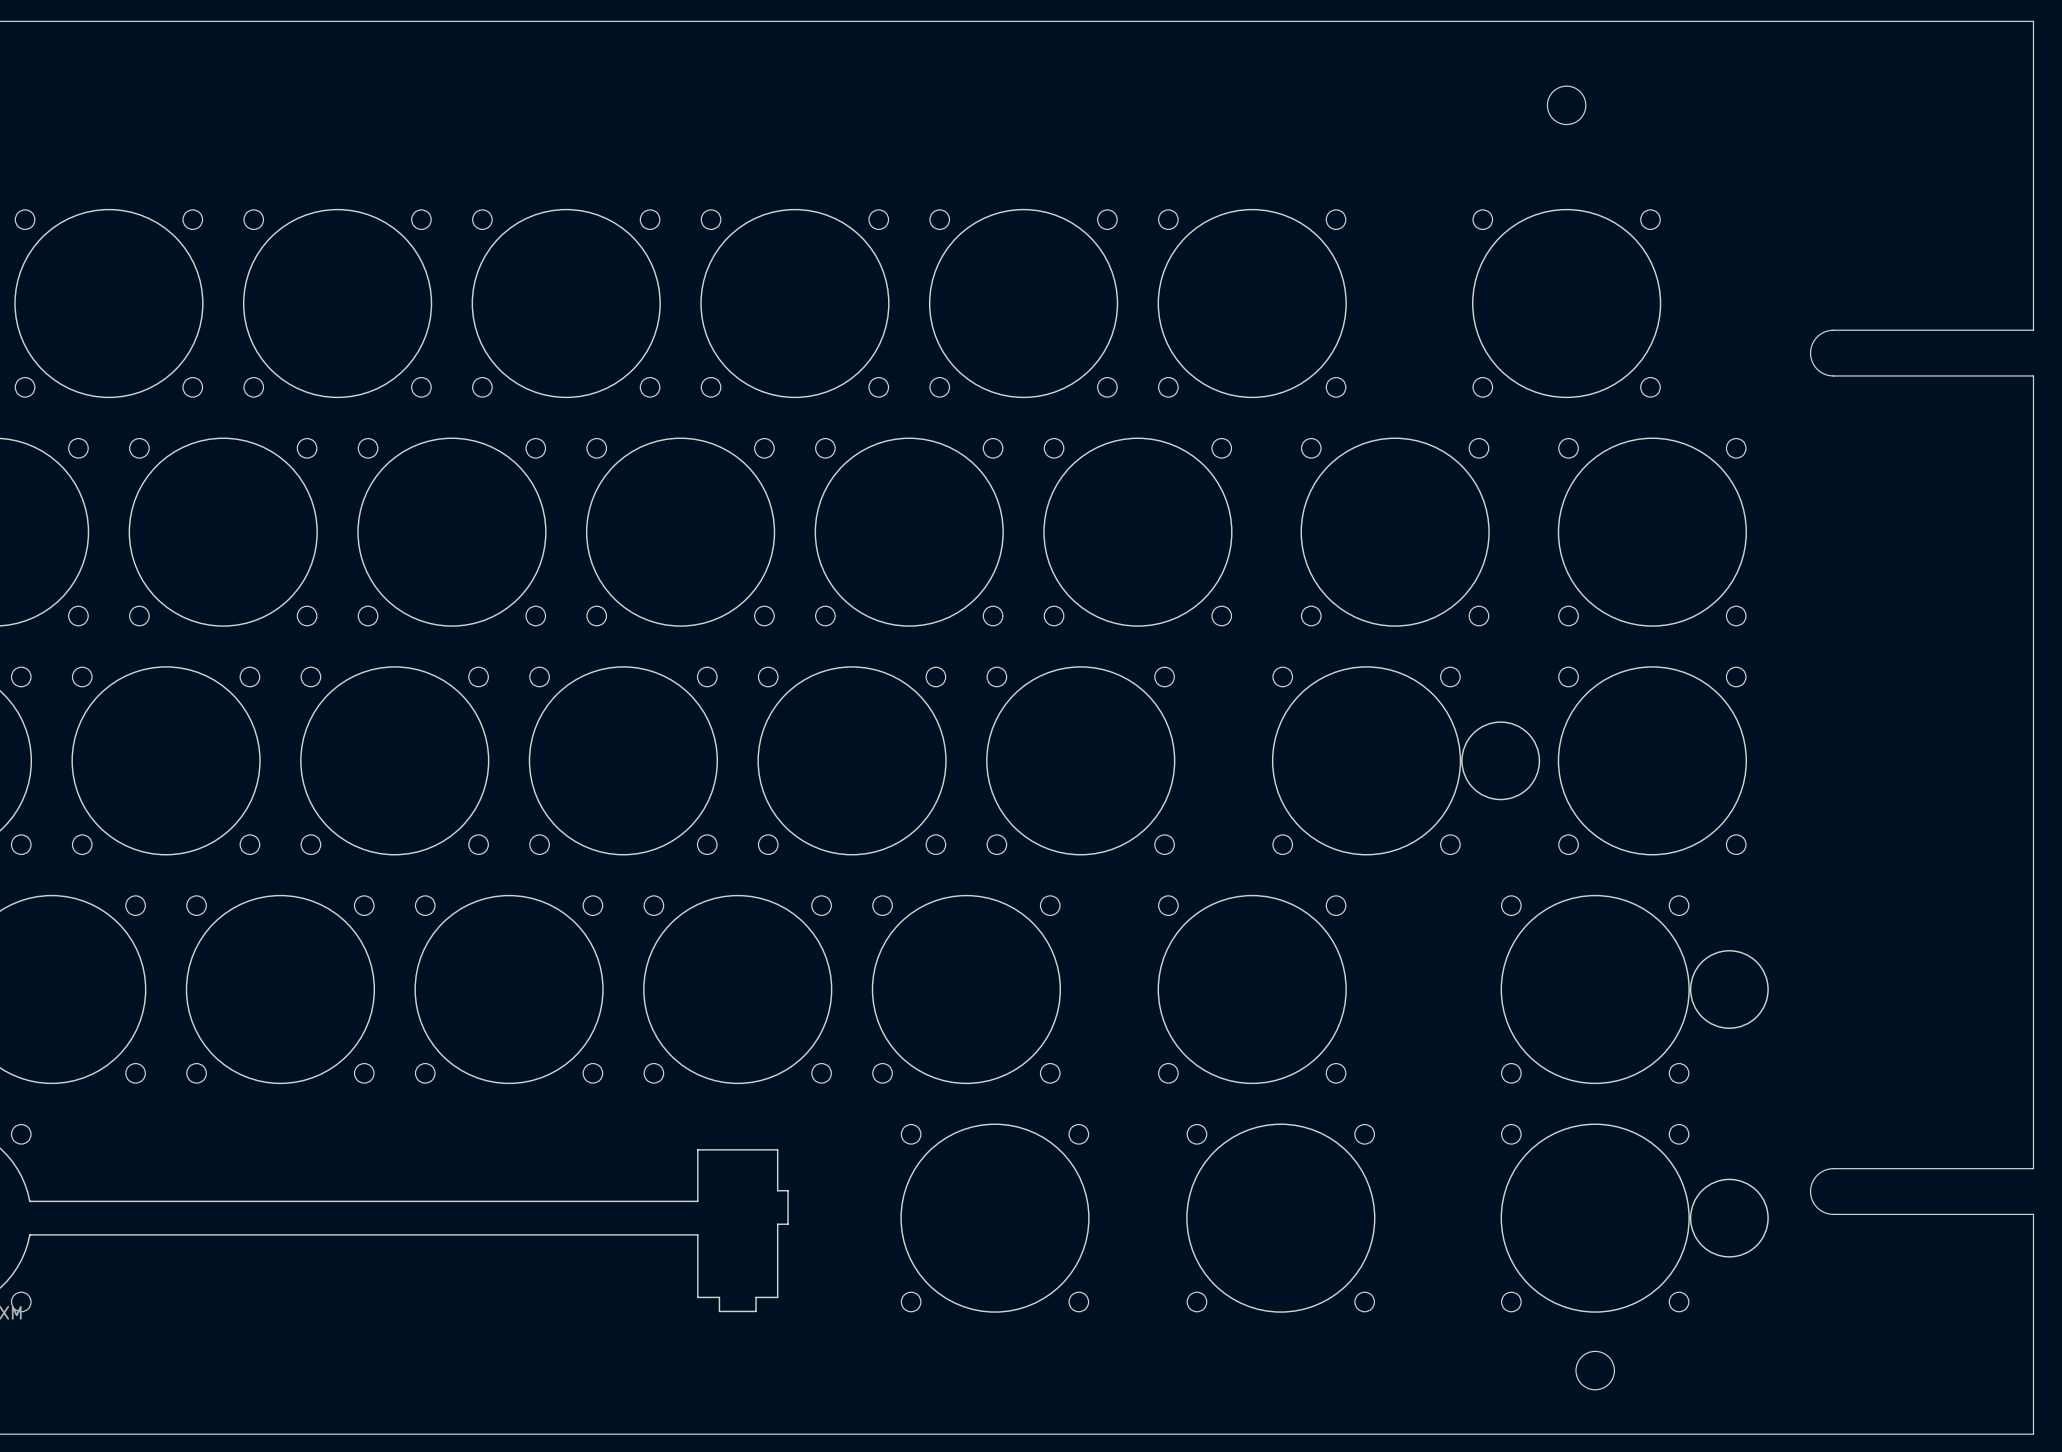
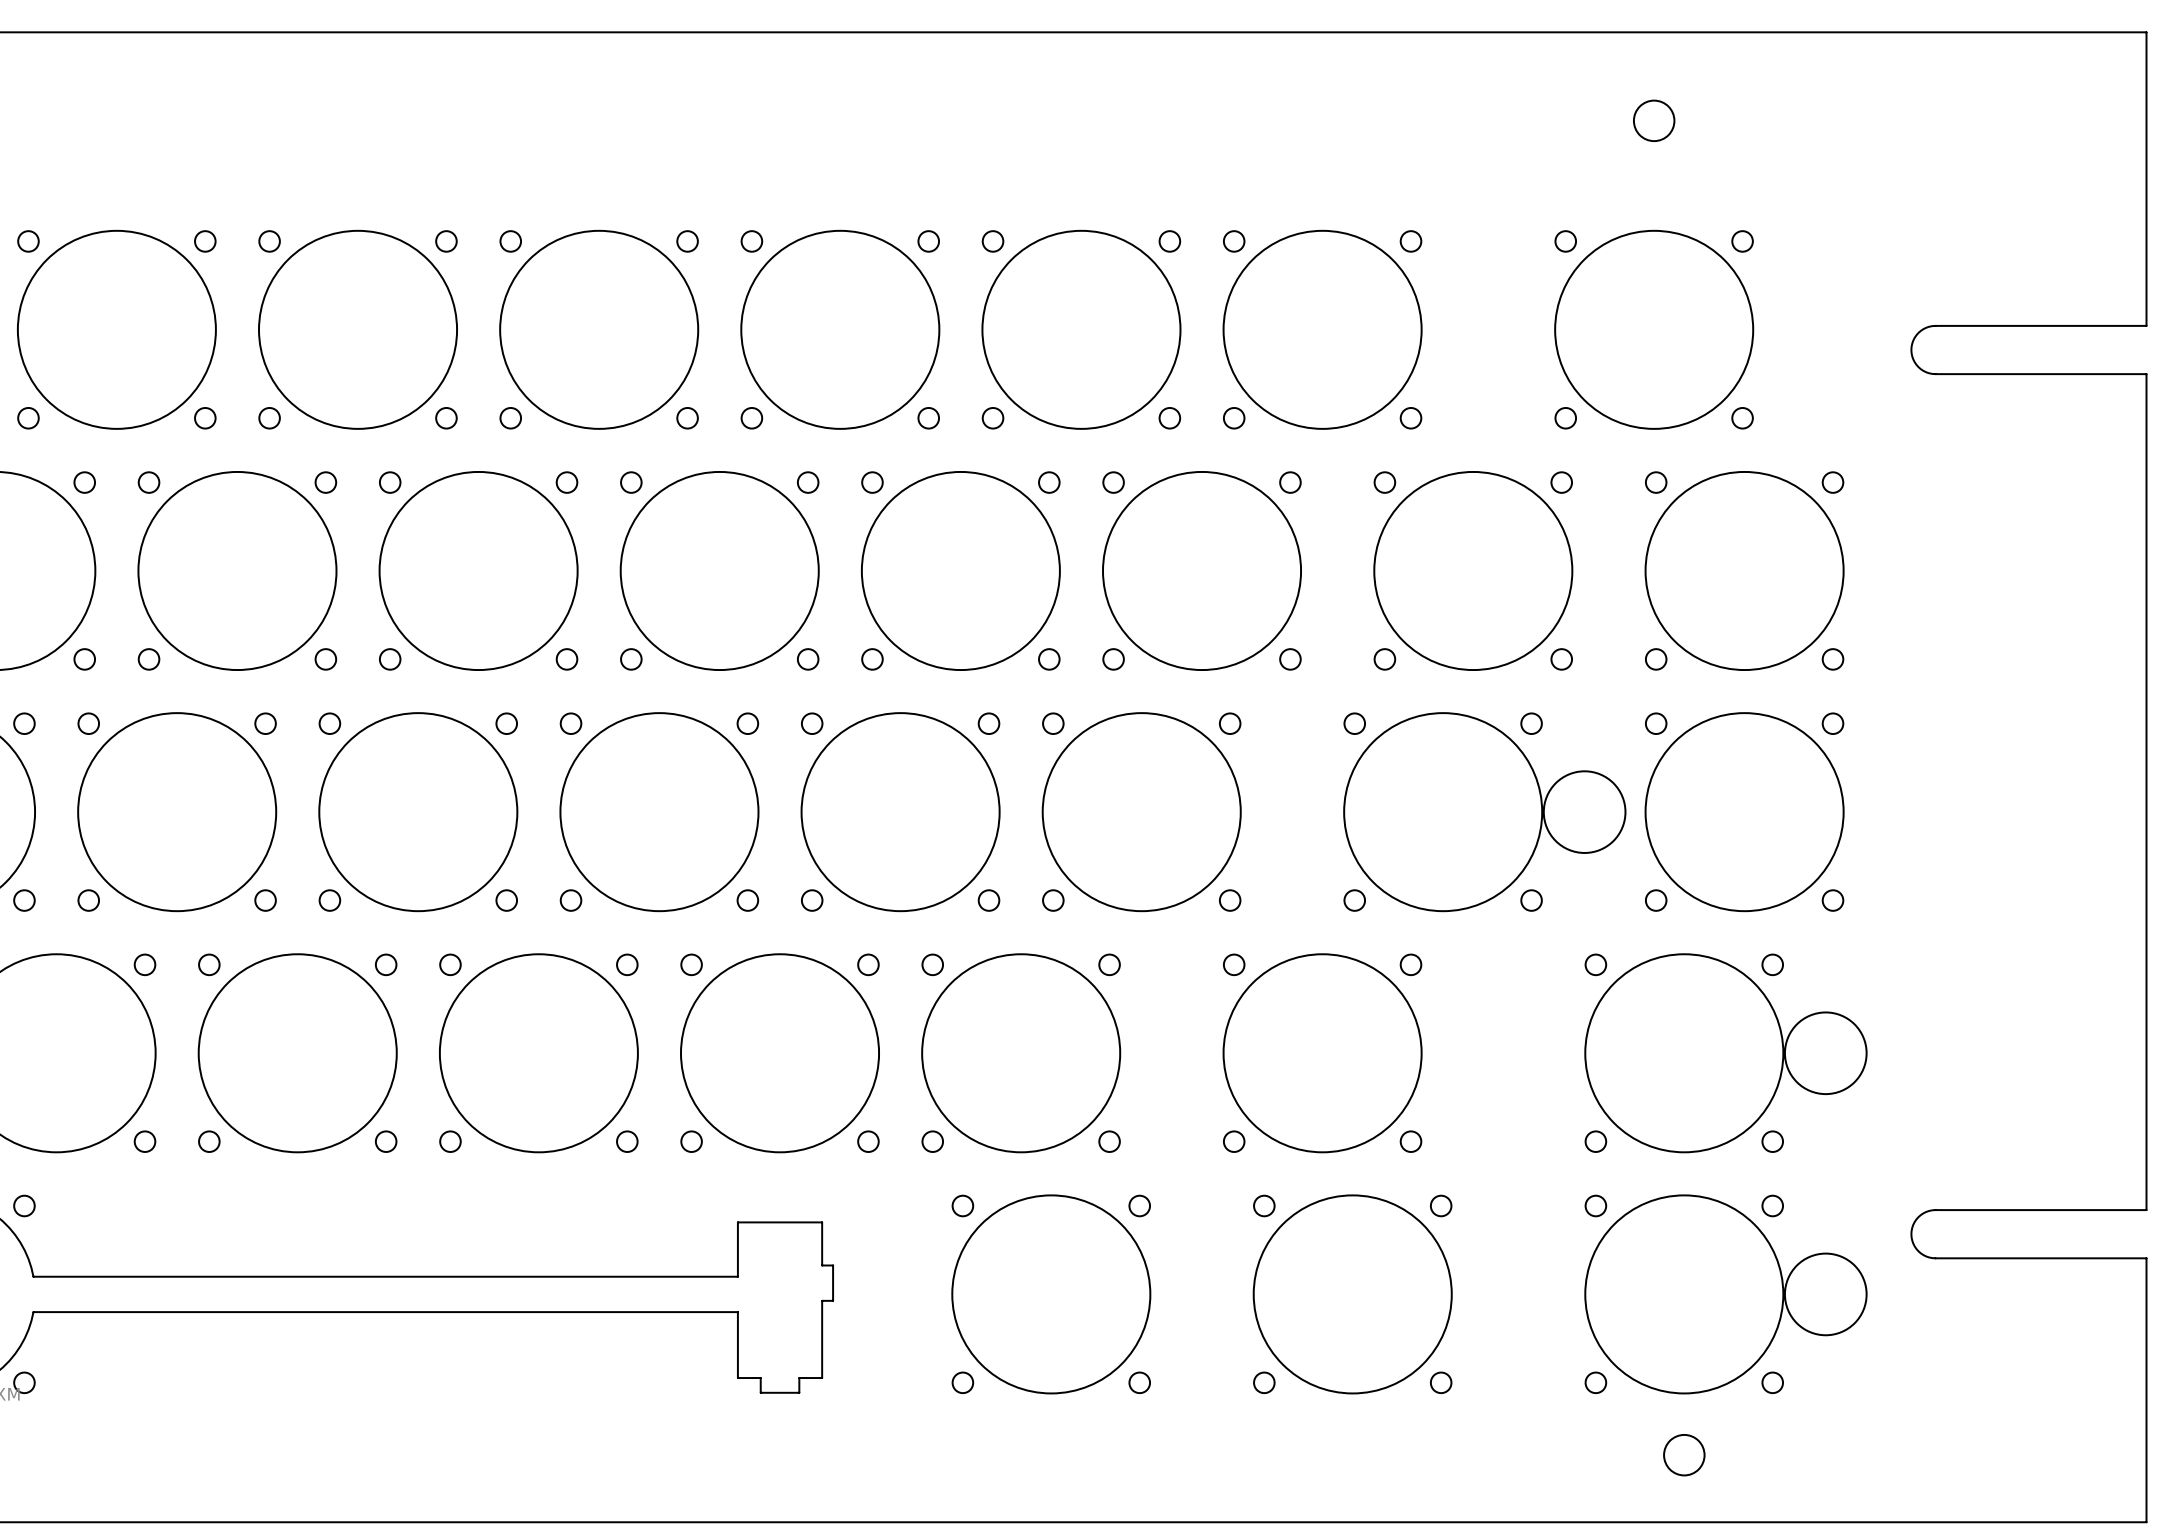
board edge: (2033, 299) (2033, 330) (1830, 330) (1821, 333) (1815, 339) (1810, 353) (1815, 367) (1821, 372) (1830, 375) (2033, 375) -> (2146, 325) (1932, 326) (1923, 329) (1916, 335) (1911, 350) (1916, 364) (1923, 370) (1932, 373) (2146, 374) (2146, 406)
board edge: (2033, 1138) (2033, 1168) (1830, 1168) (1821, 1171) (1815, 1177) (1810, 1191) (1815, 1205) (1821, 1211) (1830, 1214) (2033, 1214) -> (2146, 1210) (1932, 1210) (1923, 1213) (1916, 1219) (1911, 1234) (1916, 1248) (1923, 1255) (1932, 1258) (2146, 1258) (2146, 1290)

